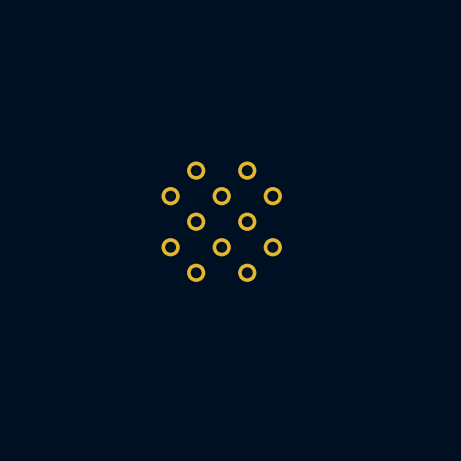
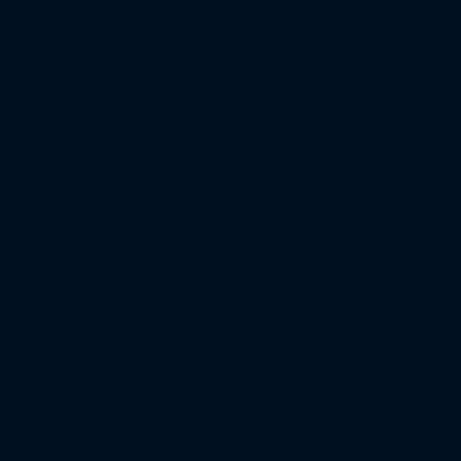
part: (221, 221) -> none

